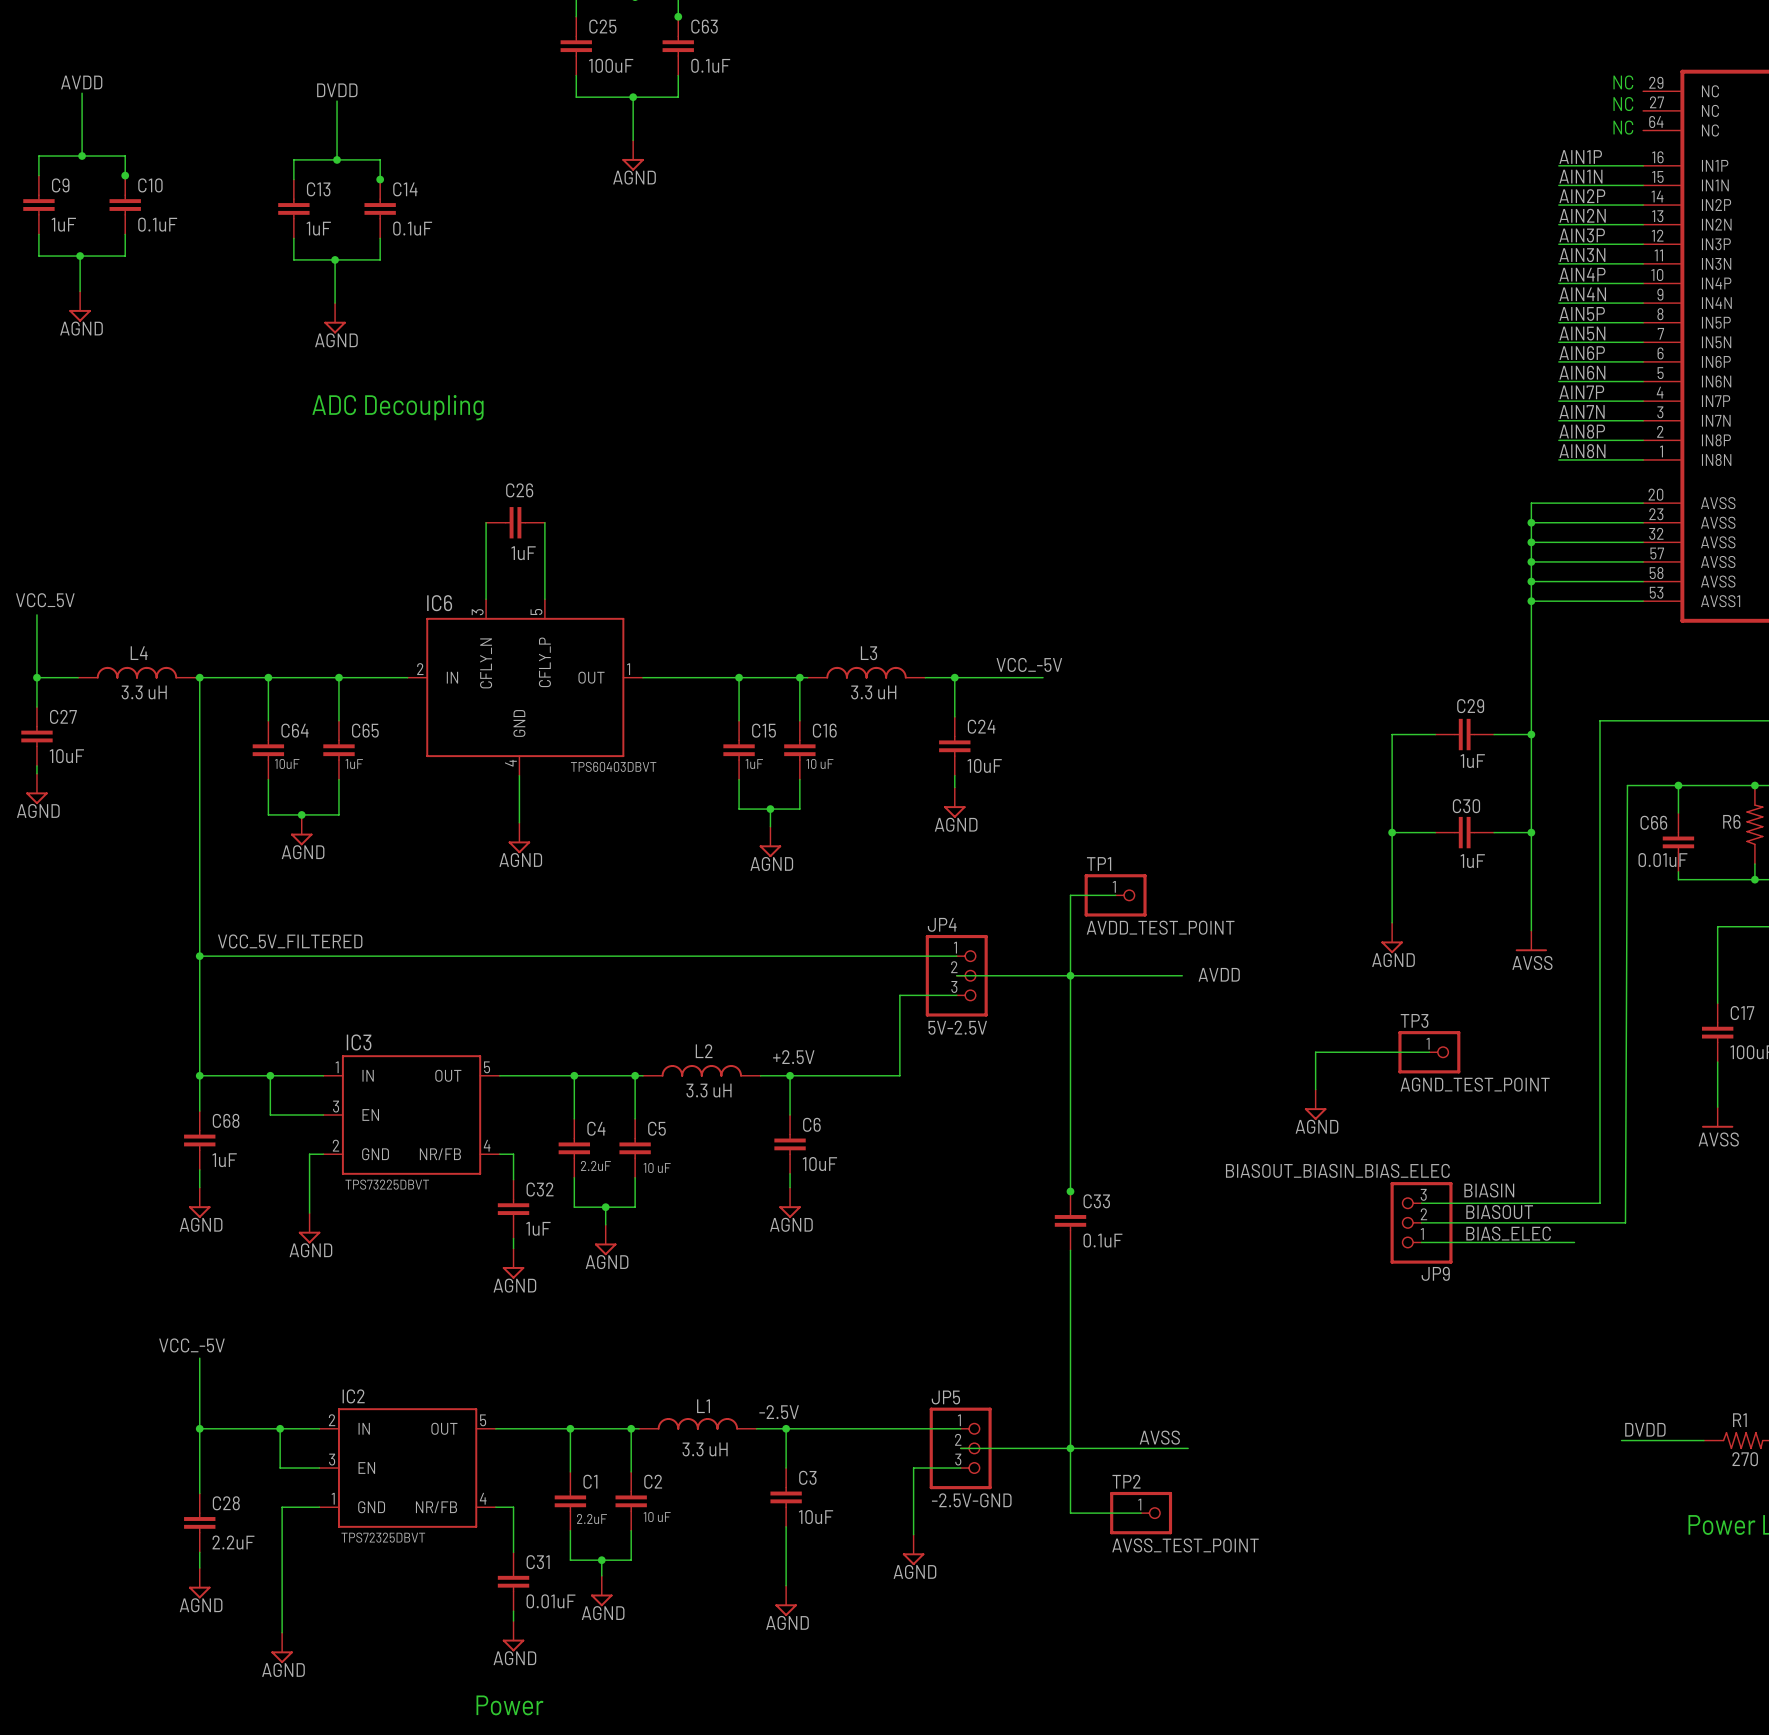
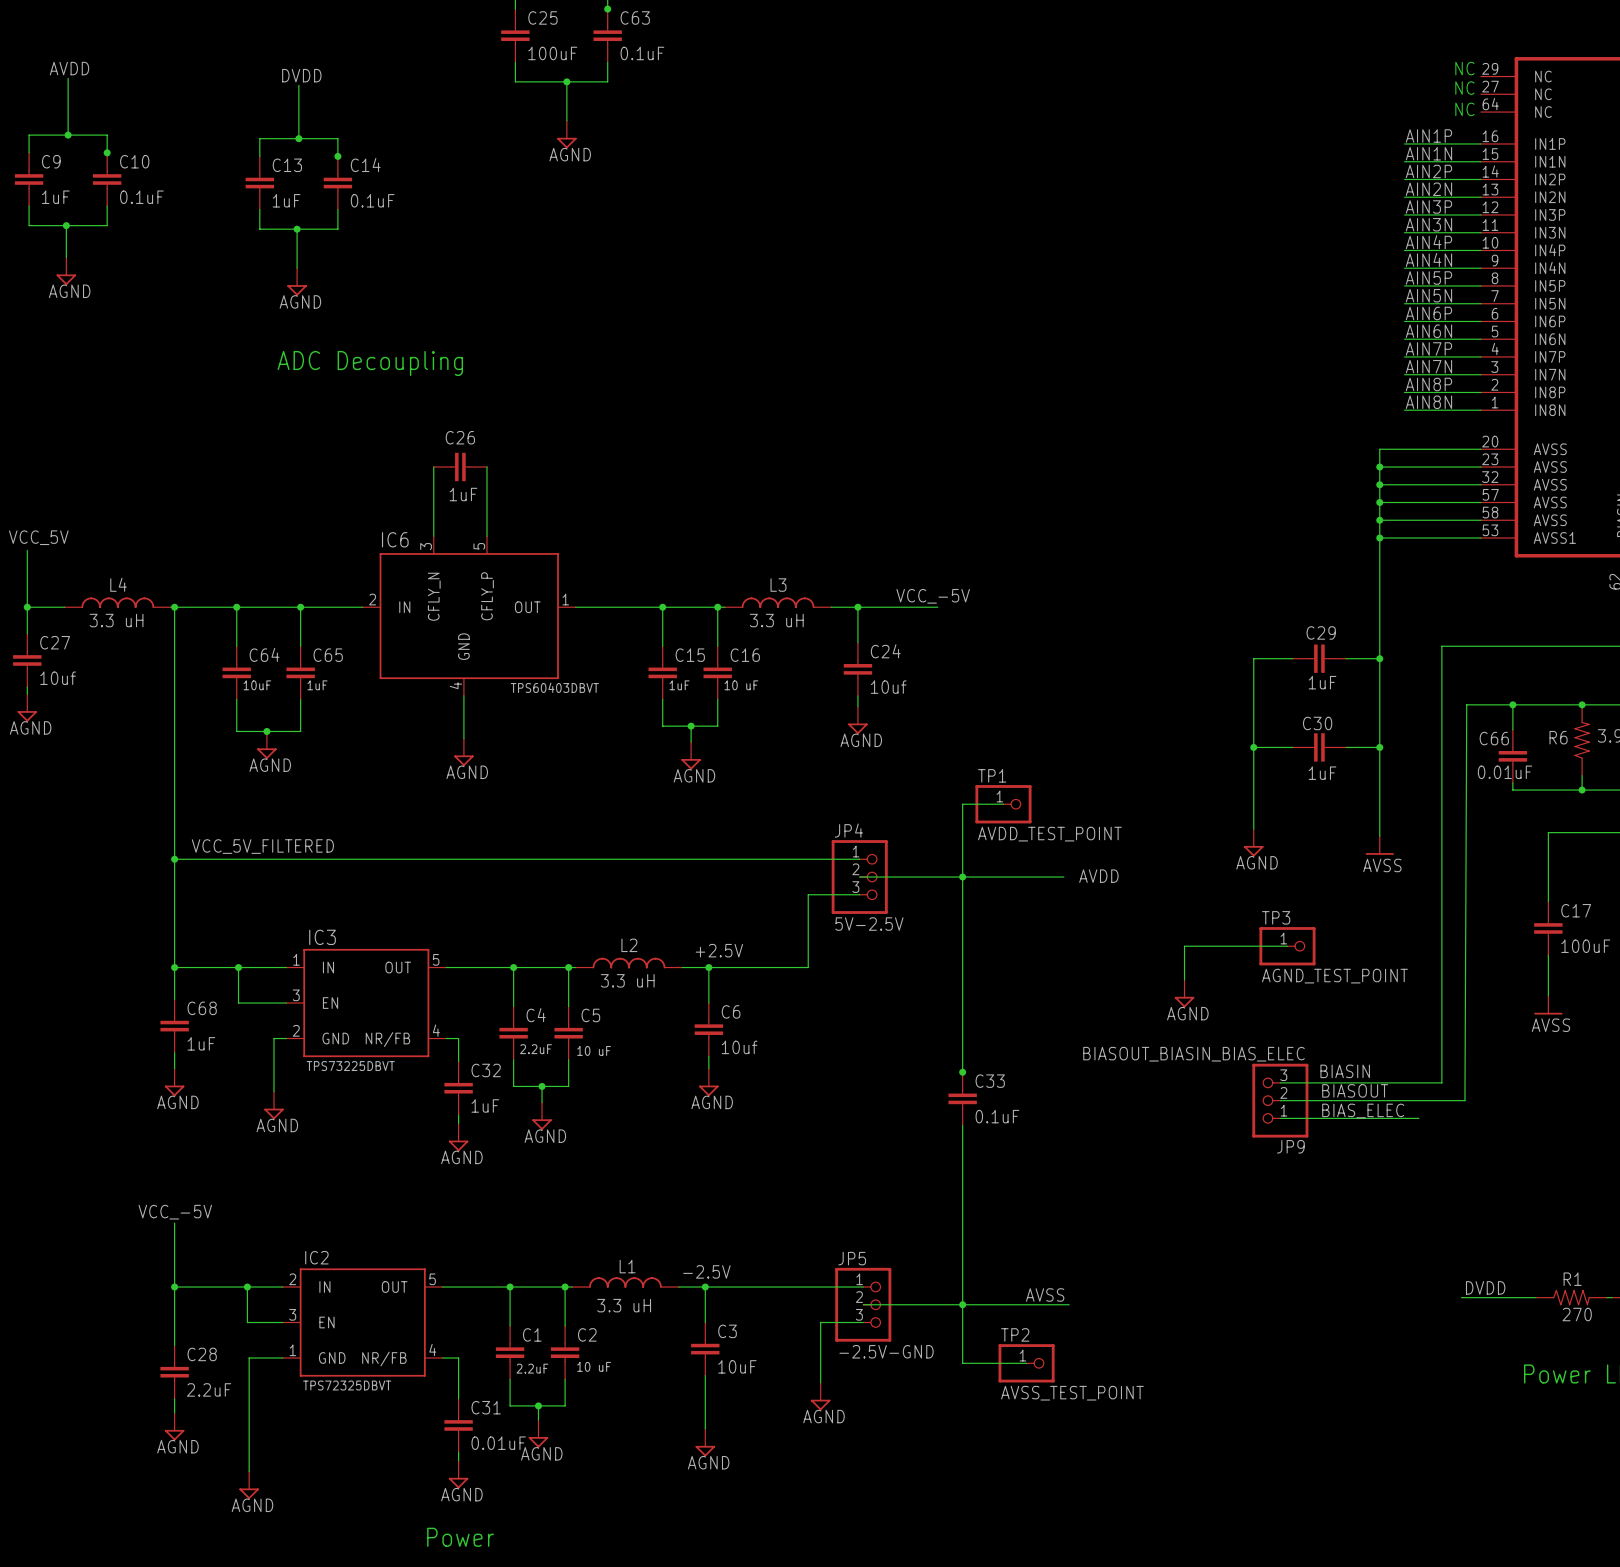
C27 value: 10uF (66, 756) -> 10uf (58, 678)
C24 value: 10uF (984, 765) -> 10uf (888, 687)
C6 value: 10uF (819, 1164) -> 10uf (739, 1047)

